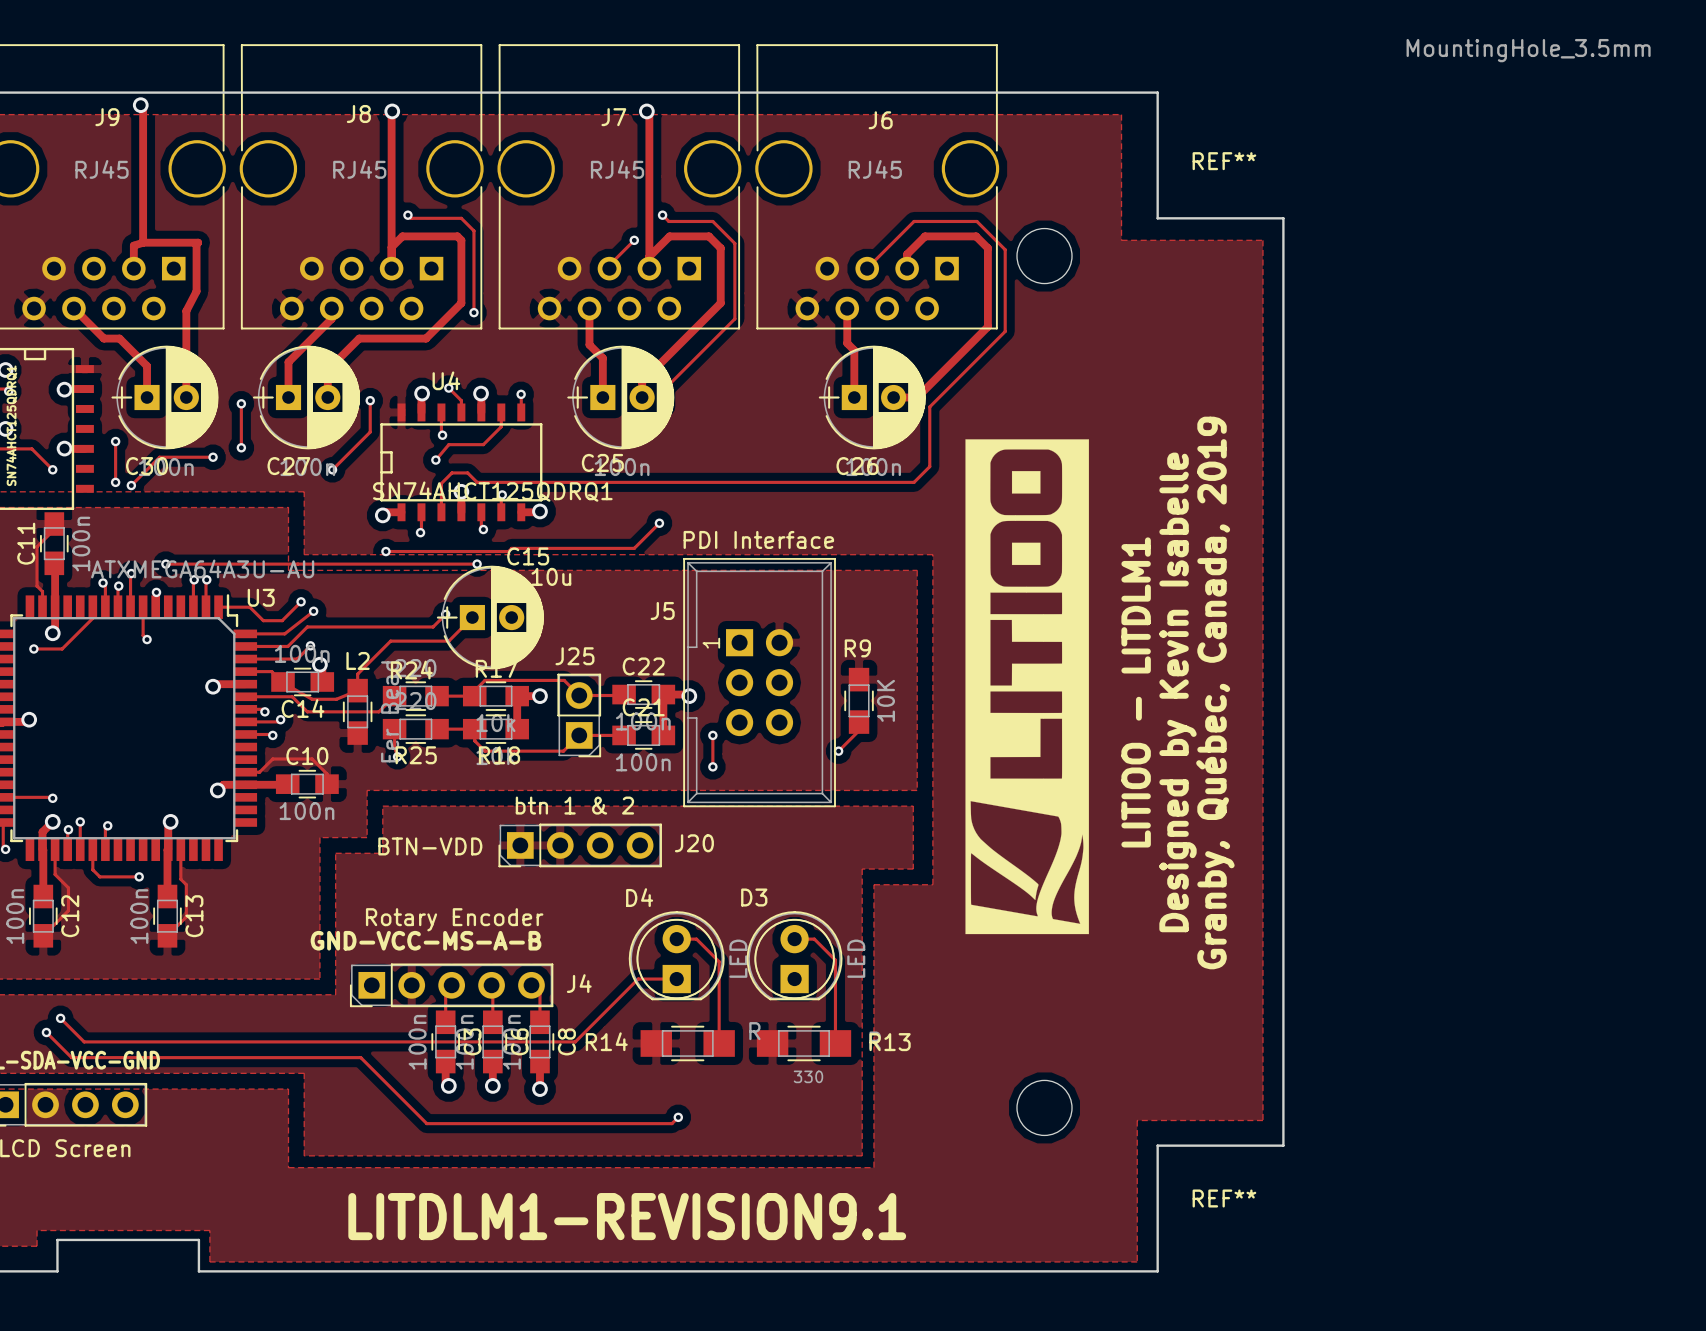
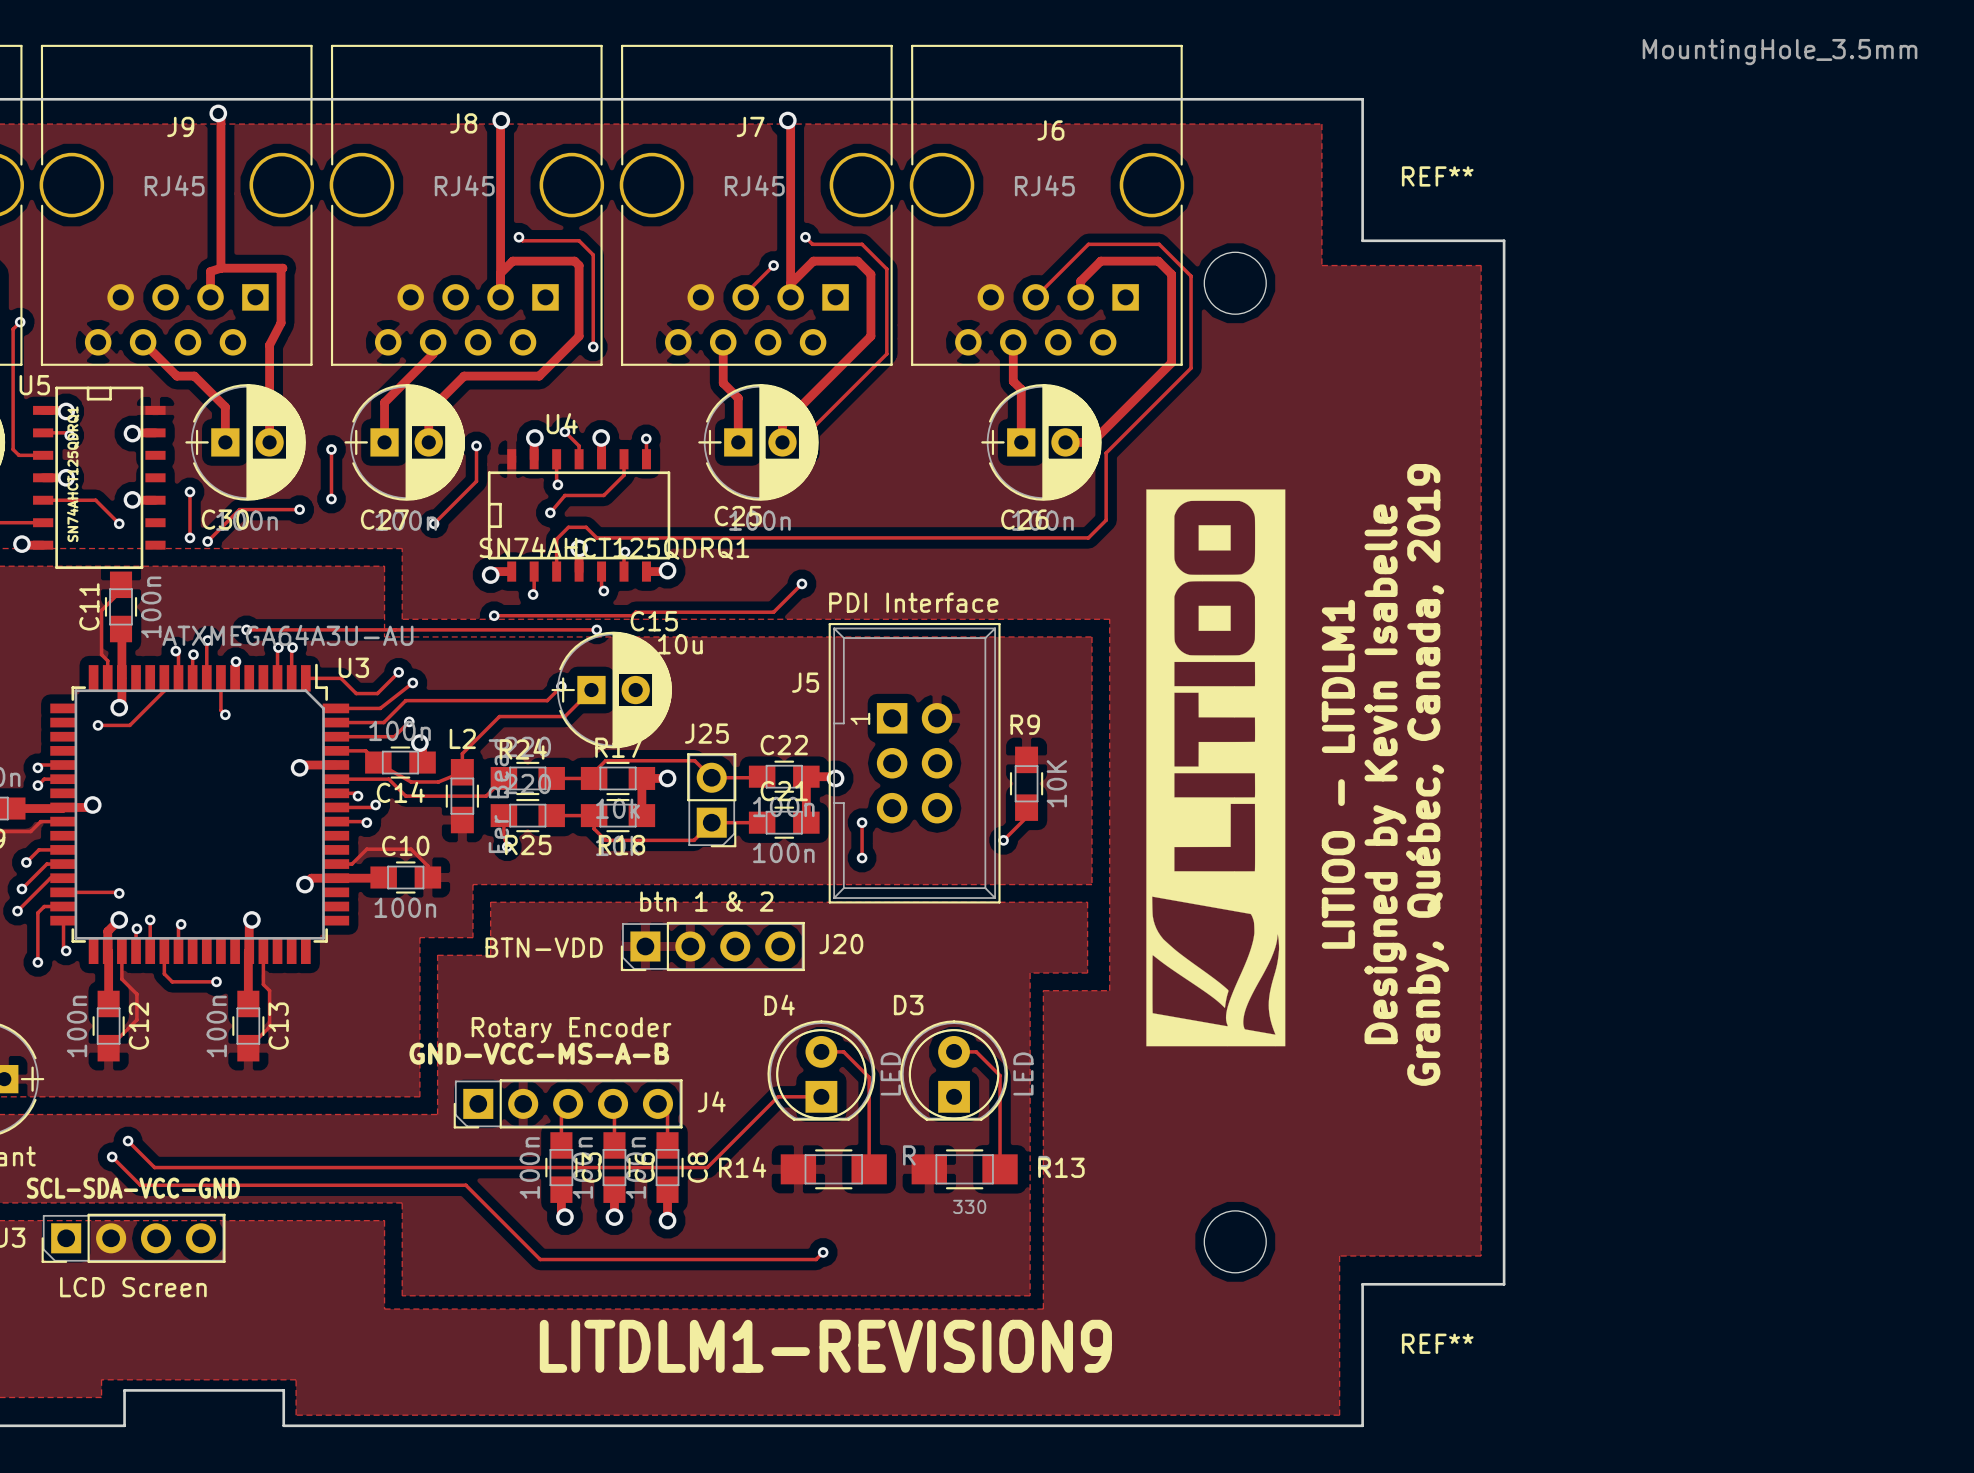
text: LITDLM1-REVISION9.1 (627, 1216) -> LITDLM1-REVISION9 (825, 1346)

